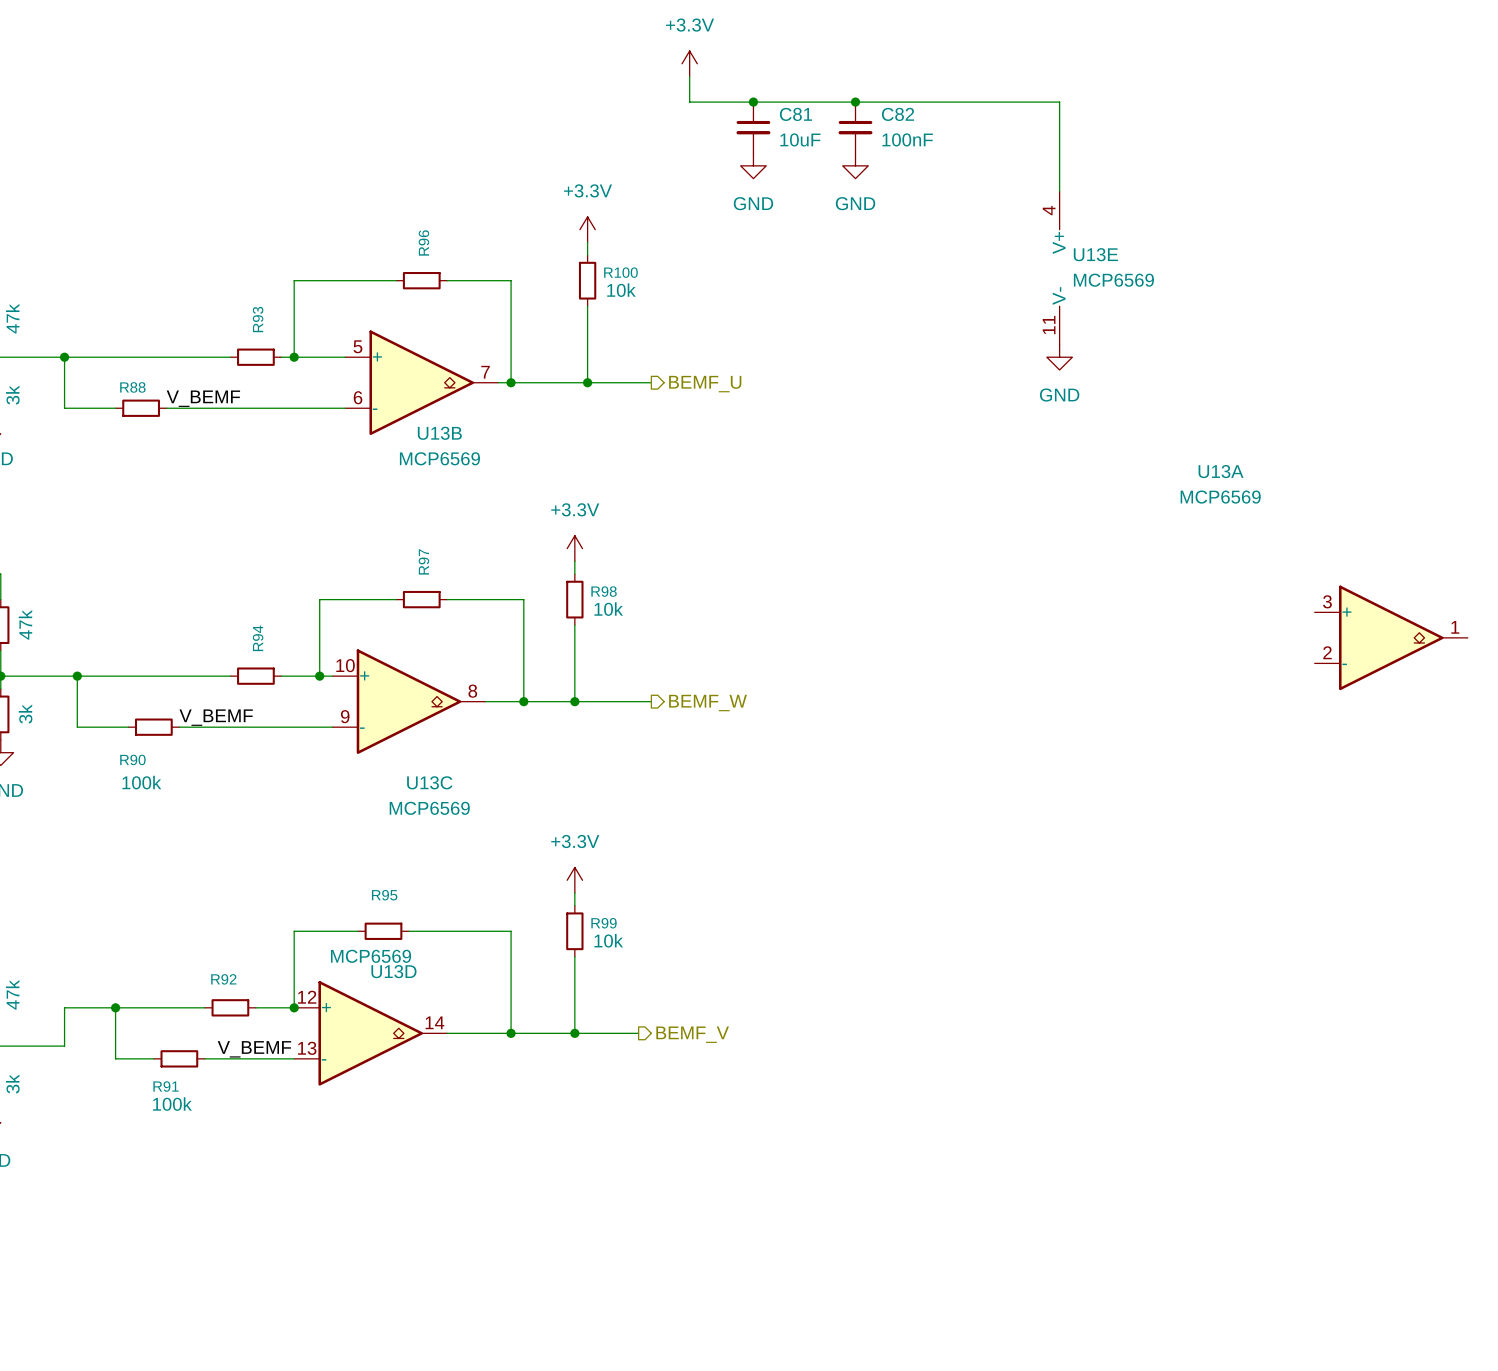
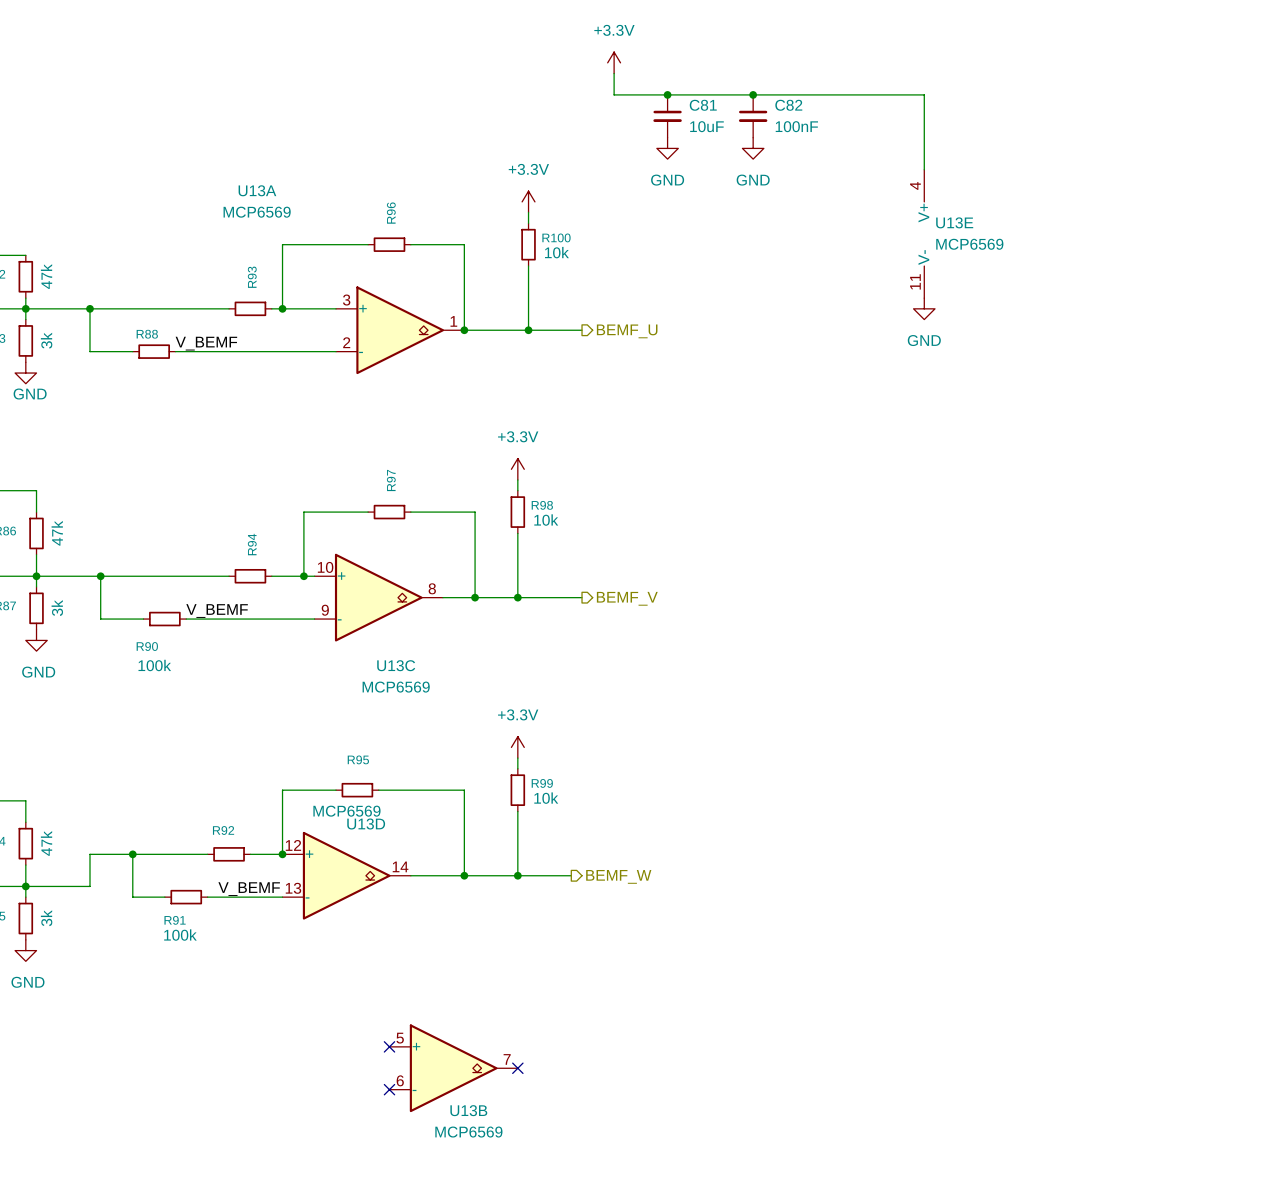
U13B position: (421, 382) -> (453, 1068)
U13A position: (1391, 637) -> (400, 330)
hierarchical label: BEMF_W (707, 703) -> BEMF_V (627, 598)
hierarchical label: BEMF_V (692, 1034) -> BEMF_W (618, 876)
no-connect mark: none -> (389, 1046)
no-connect mark: none -> (517, 1068)
no-connect mark: none -> (389, 1089)

